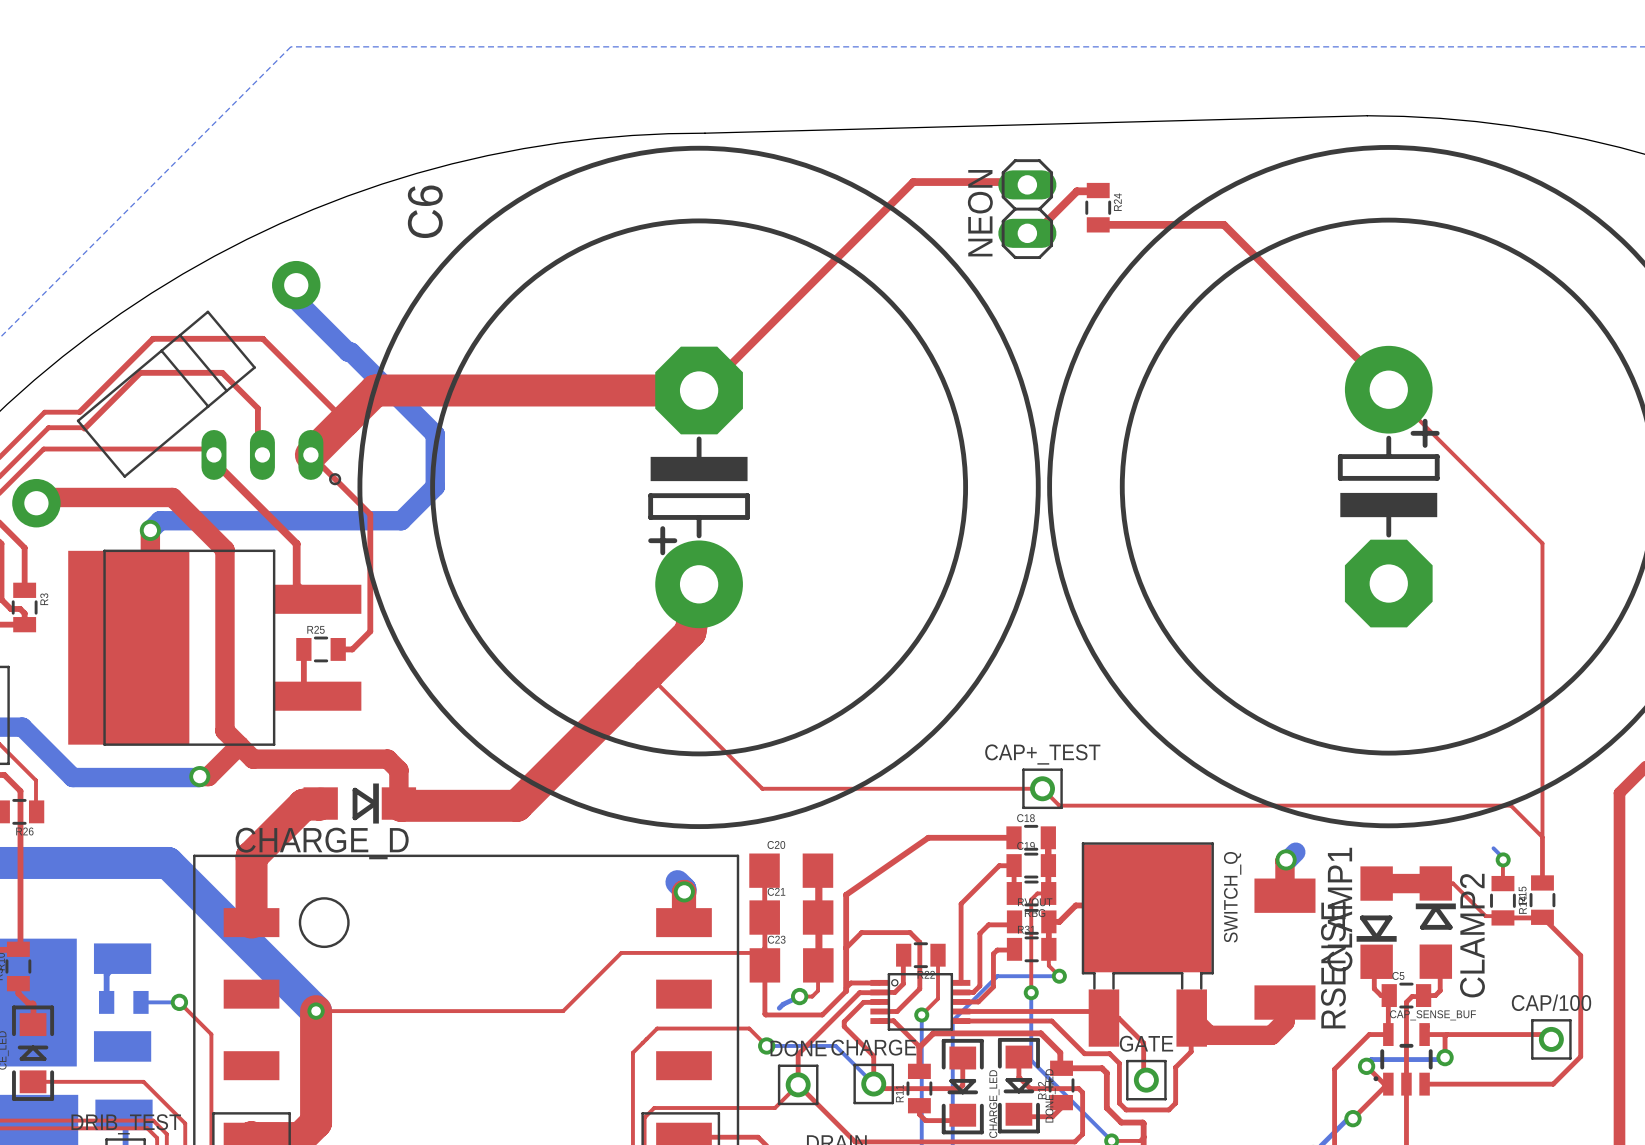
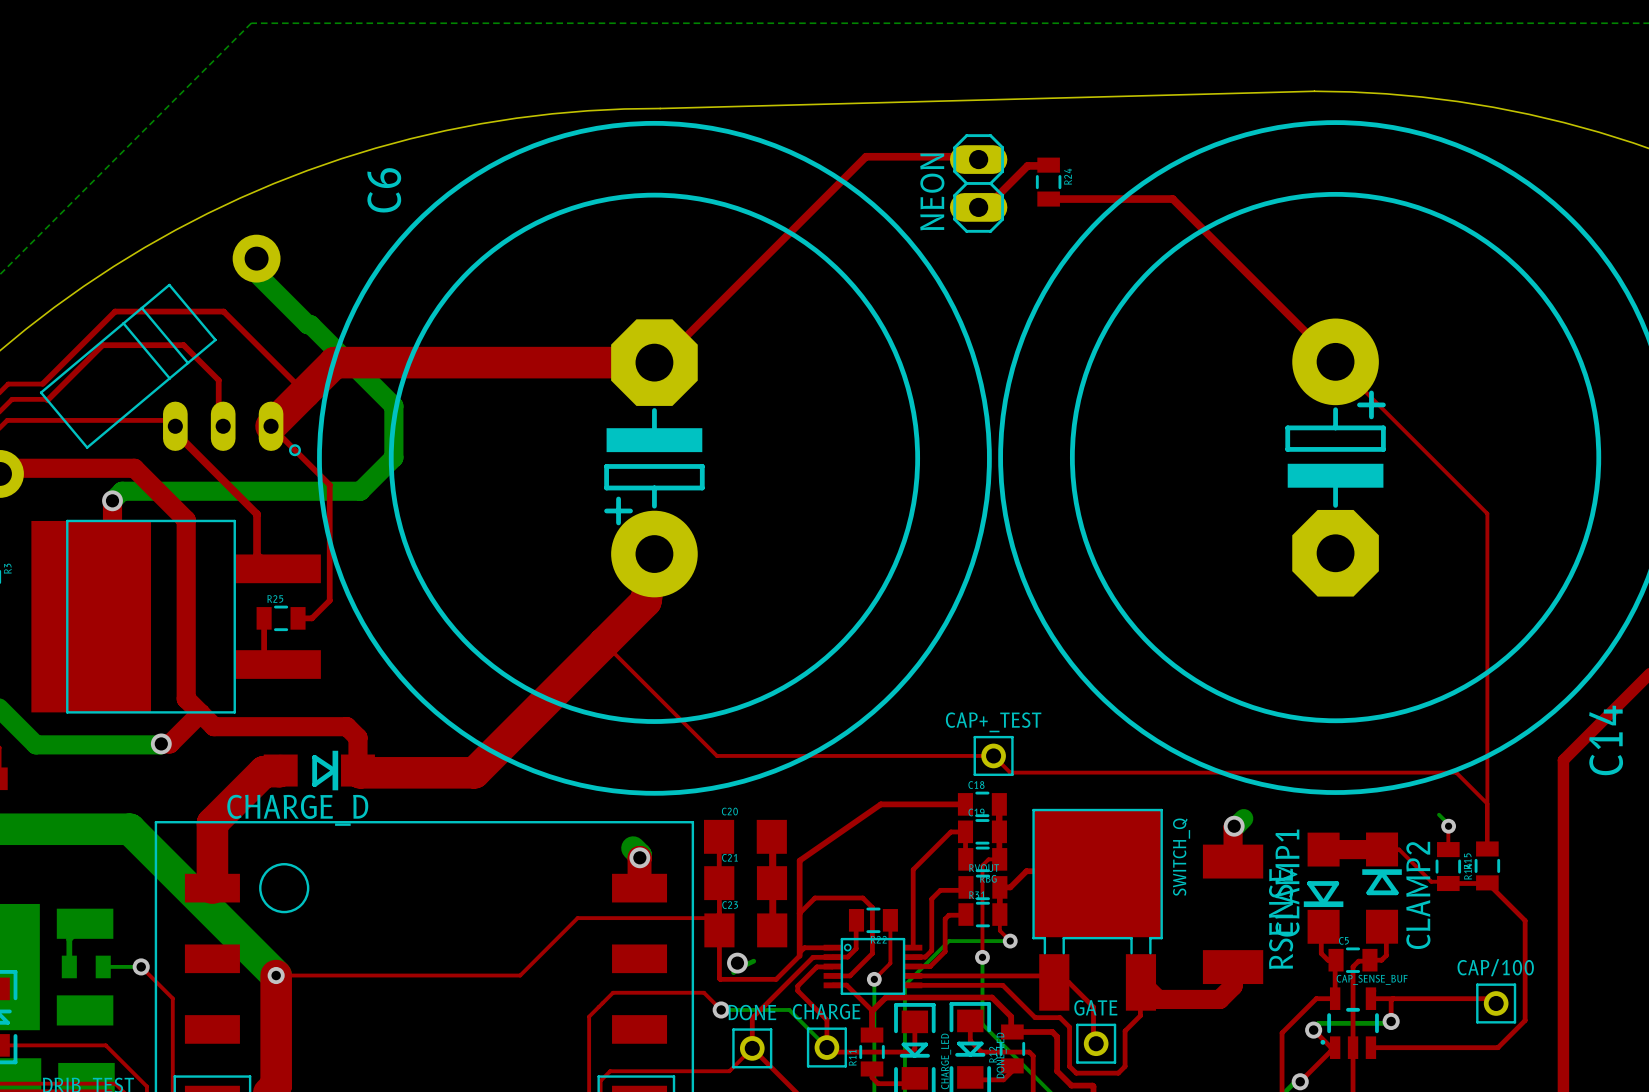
top track: (818, 965) (818, 990) (812, 996) (799, 996) -> none
via position: (799, 996) -> (737, 963)

